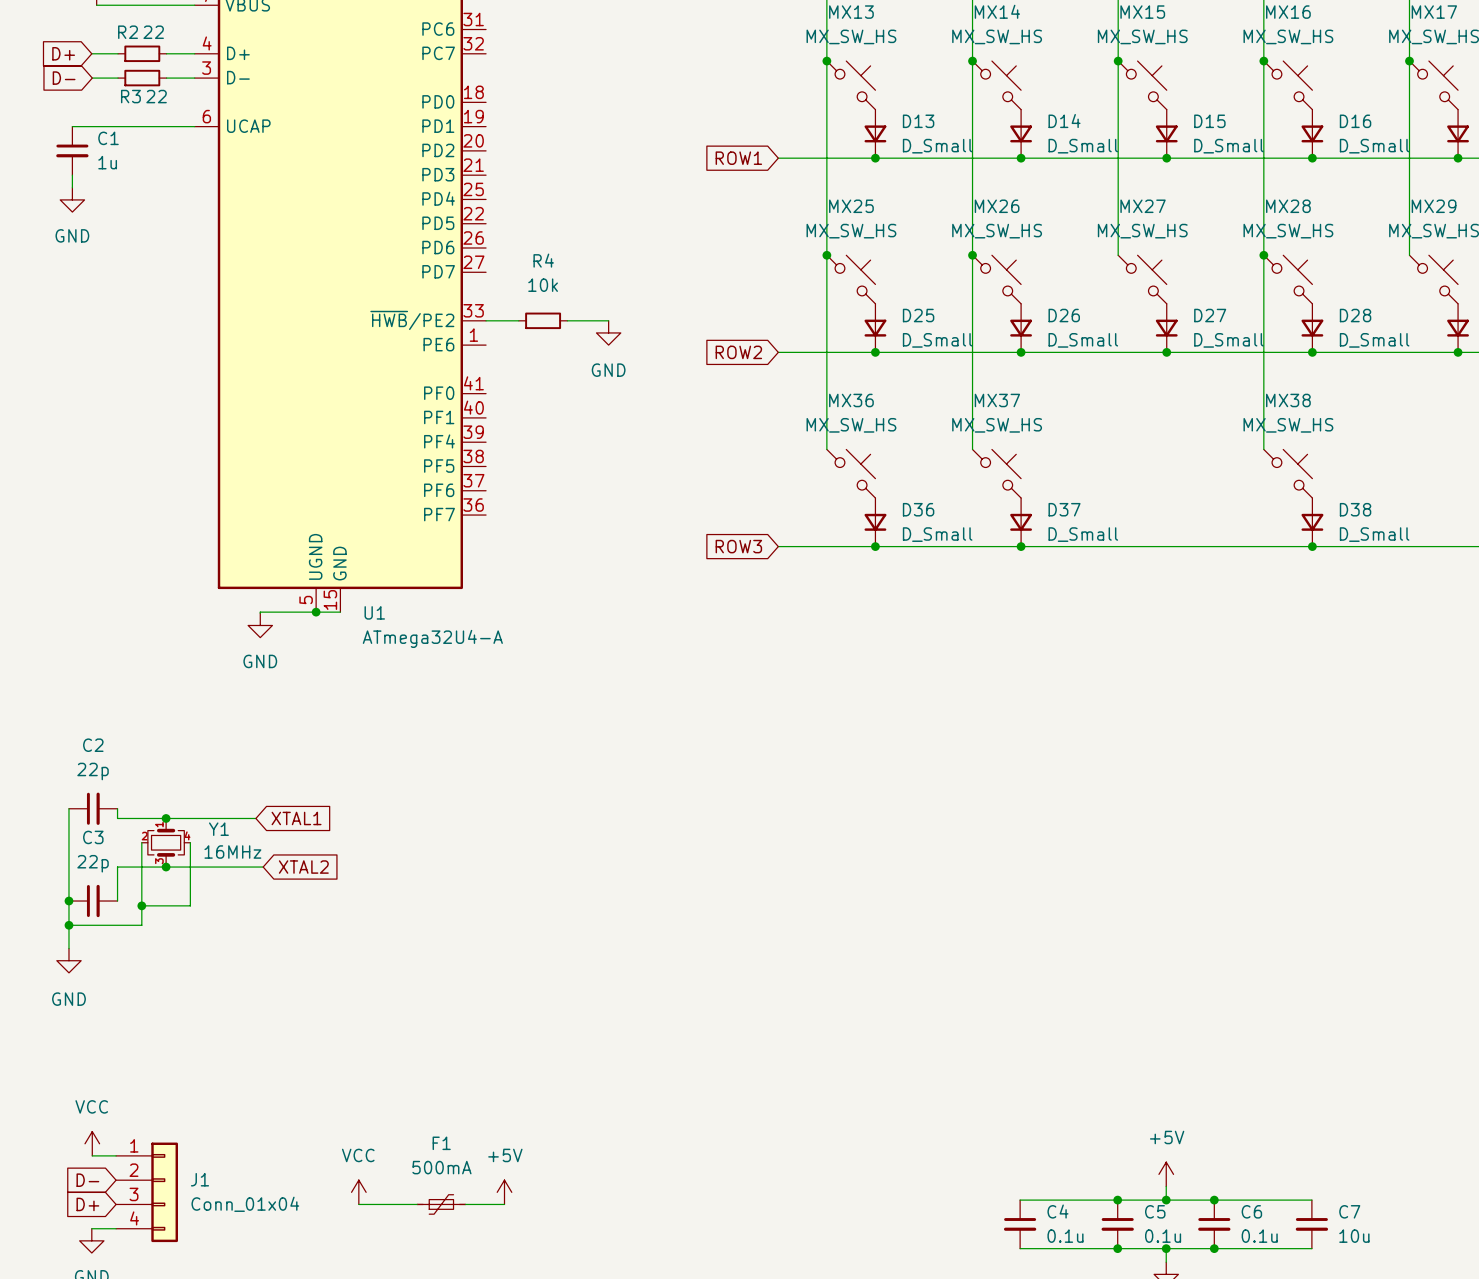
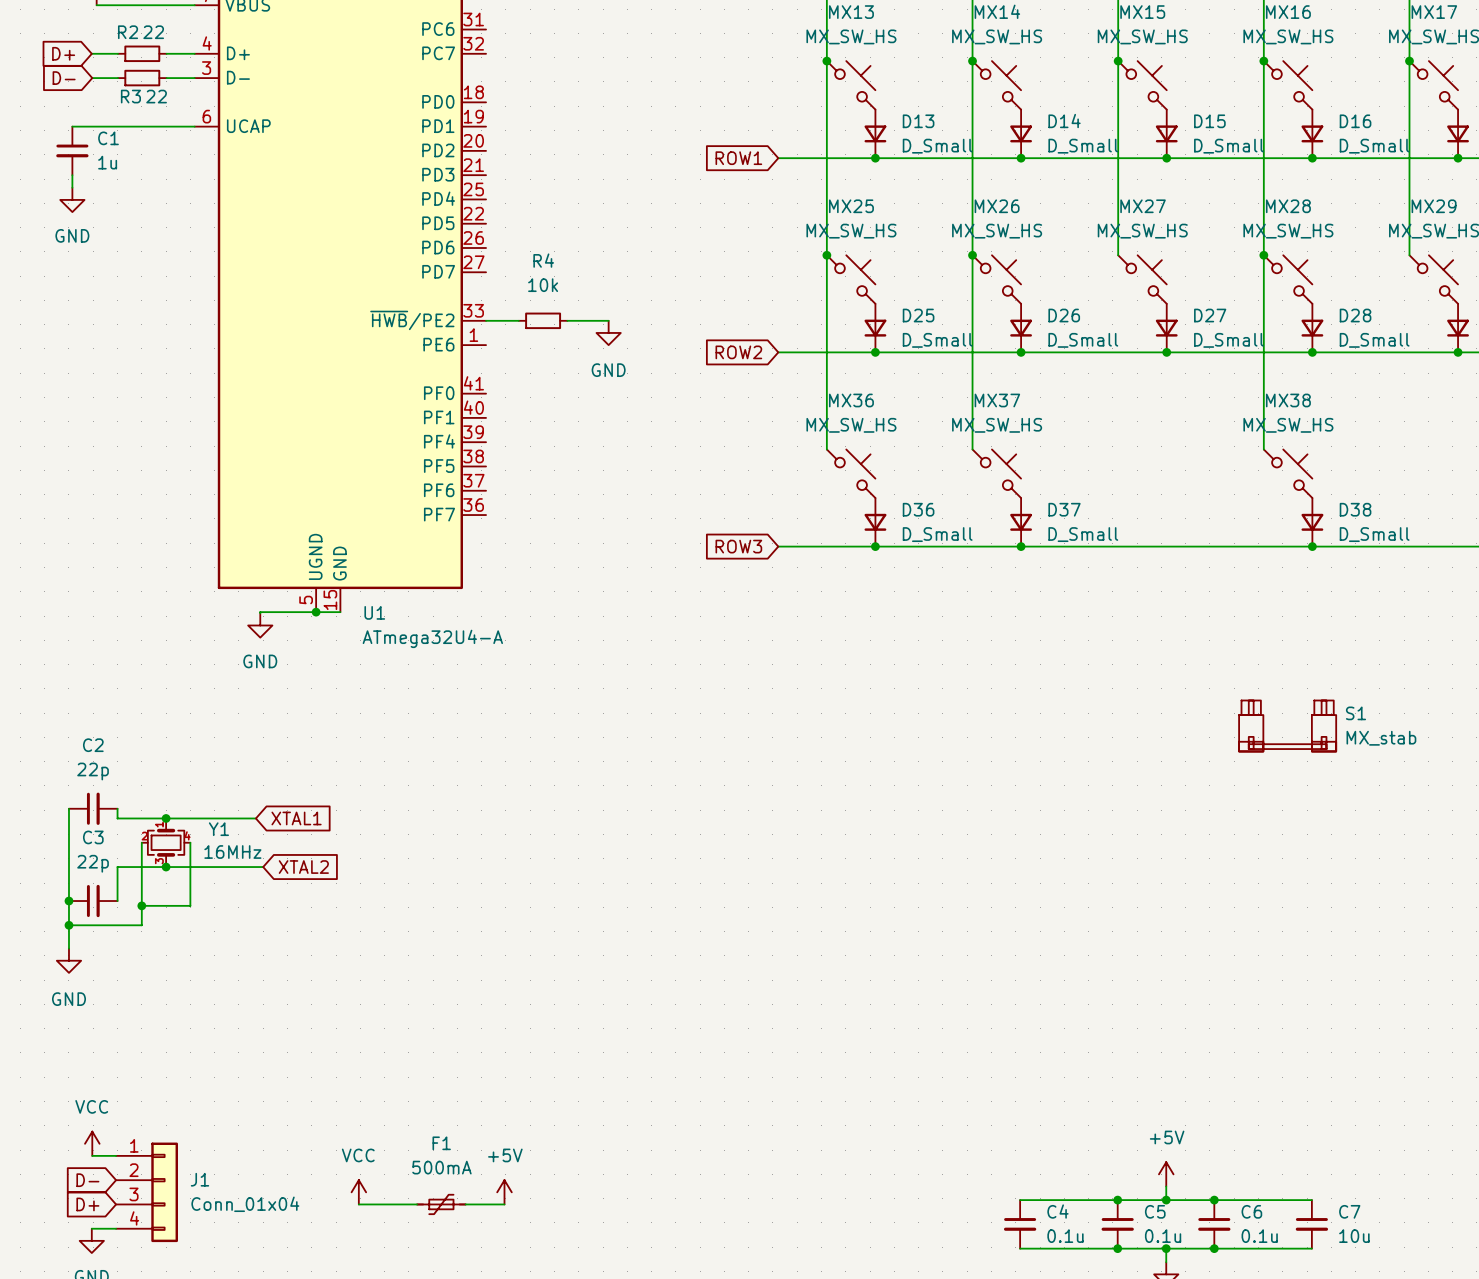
S1: none -> MX_stab (1287, 725)

